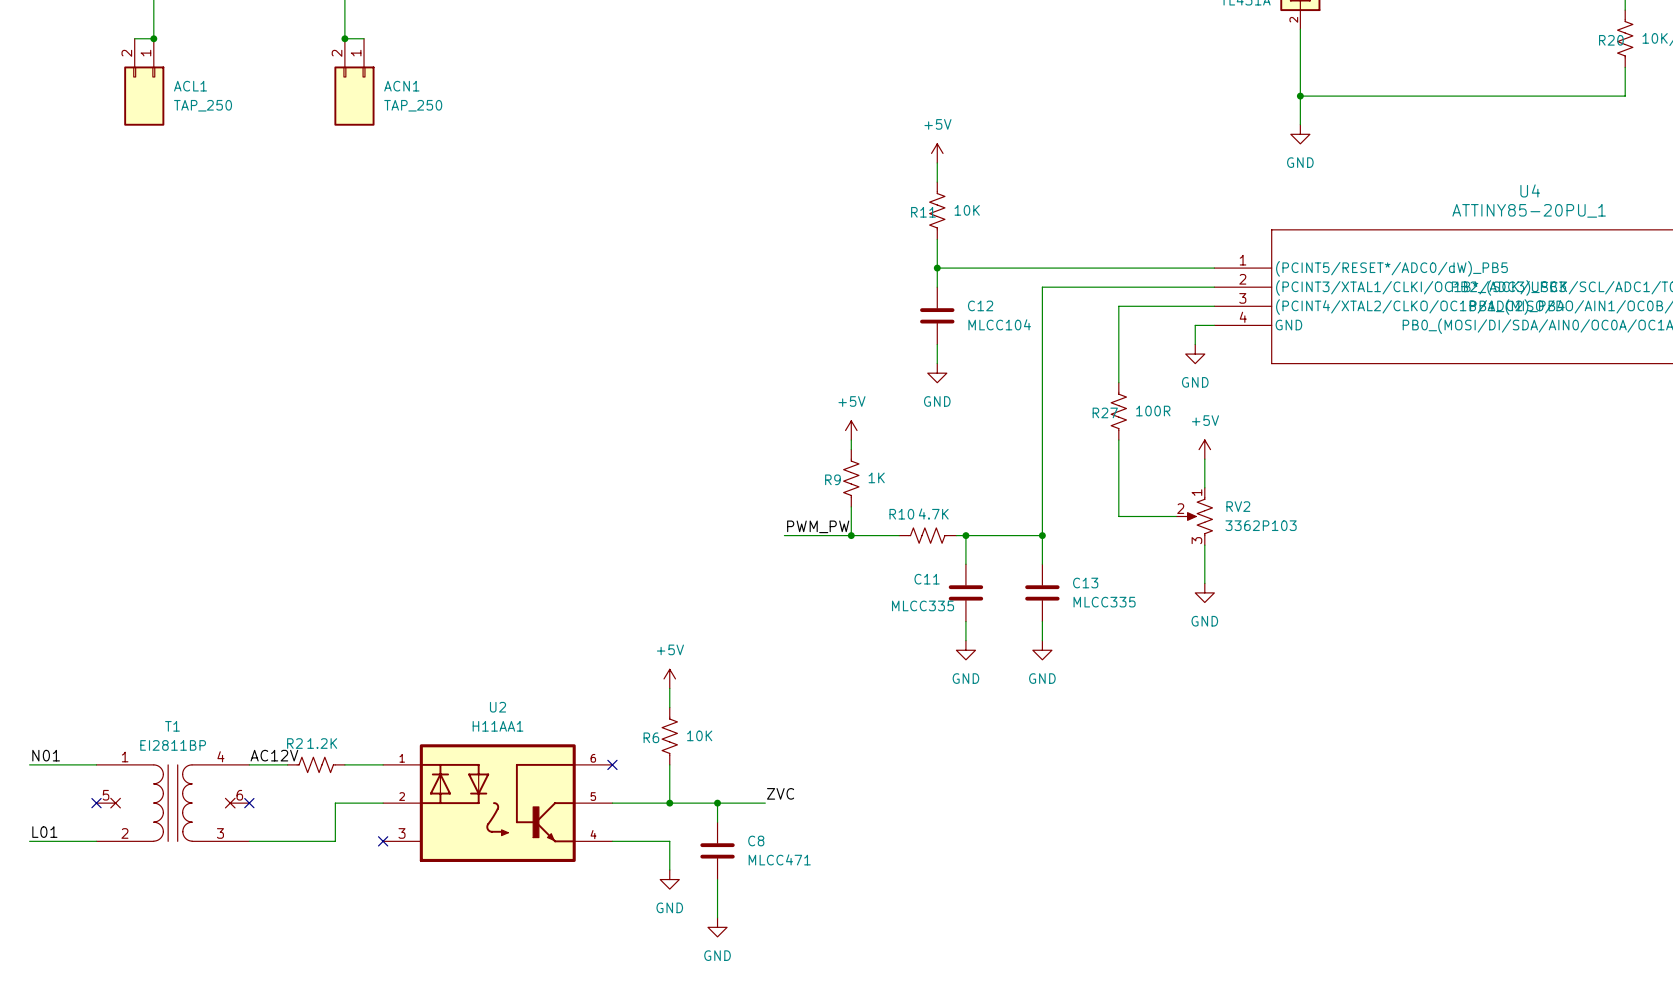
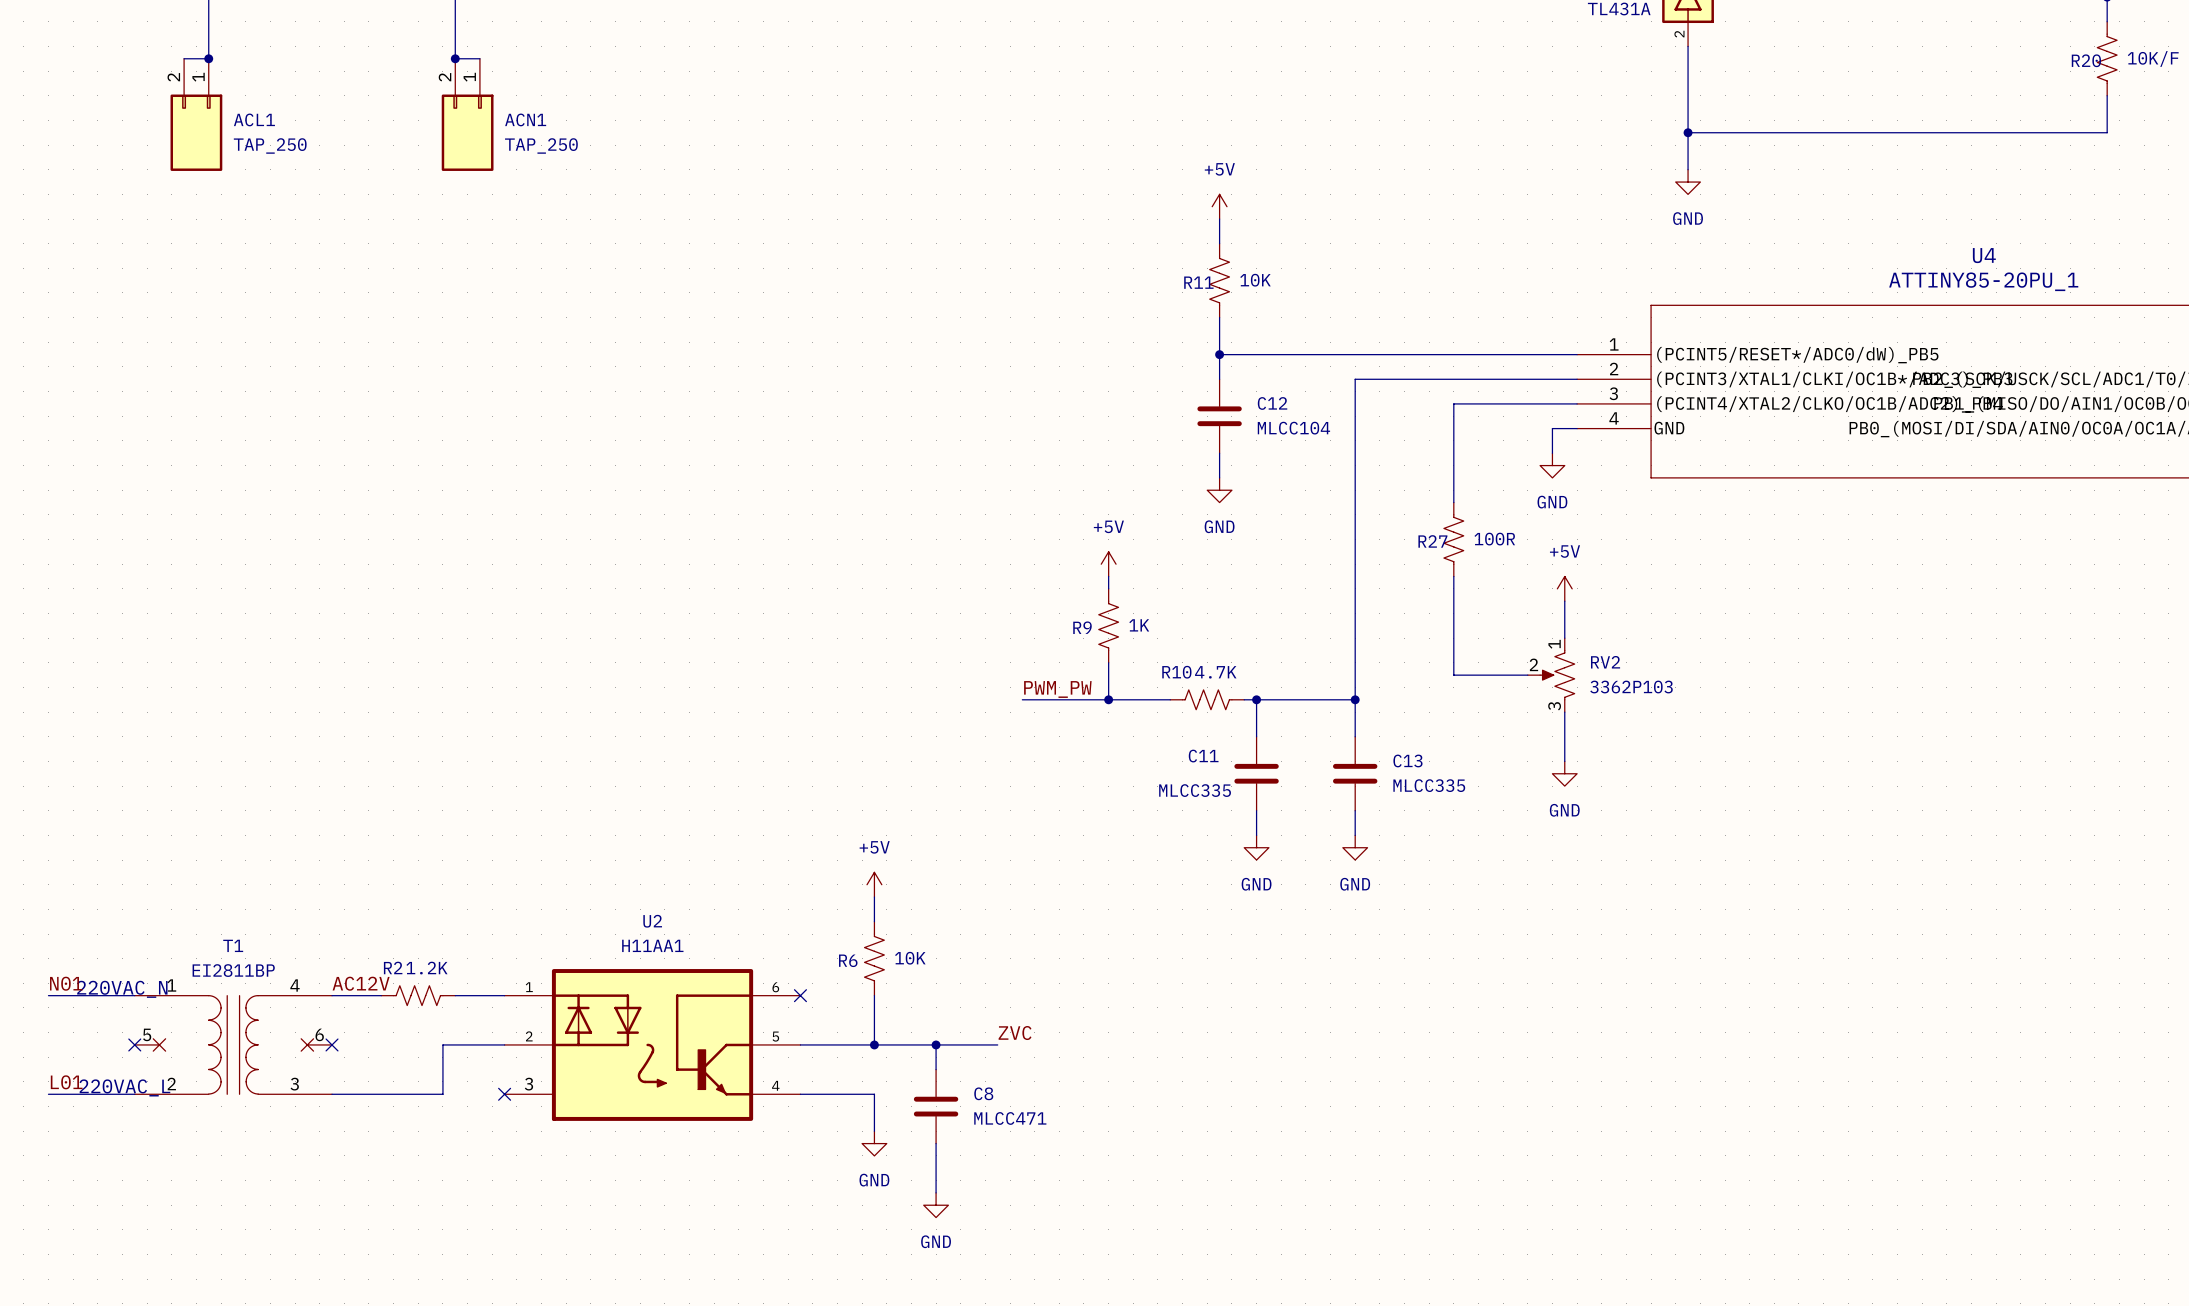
text: none -> 220VAC_N (122, 989)
text: none -> 220VAC_L (124, 1087)

